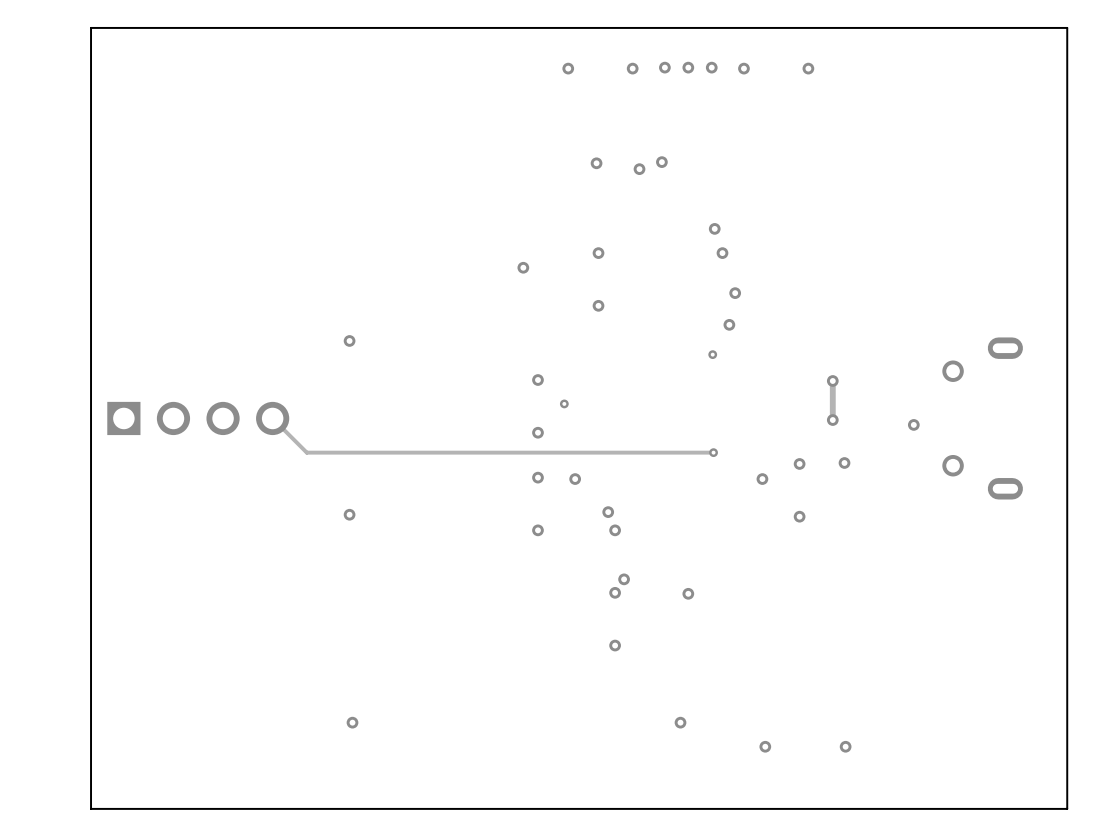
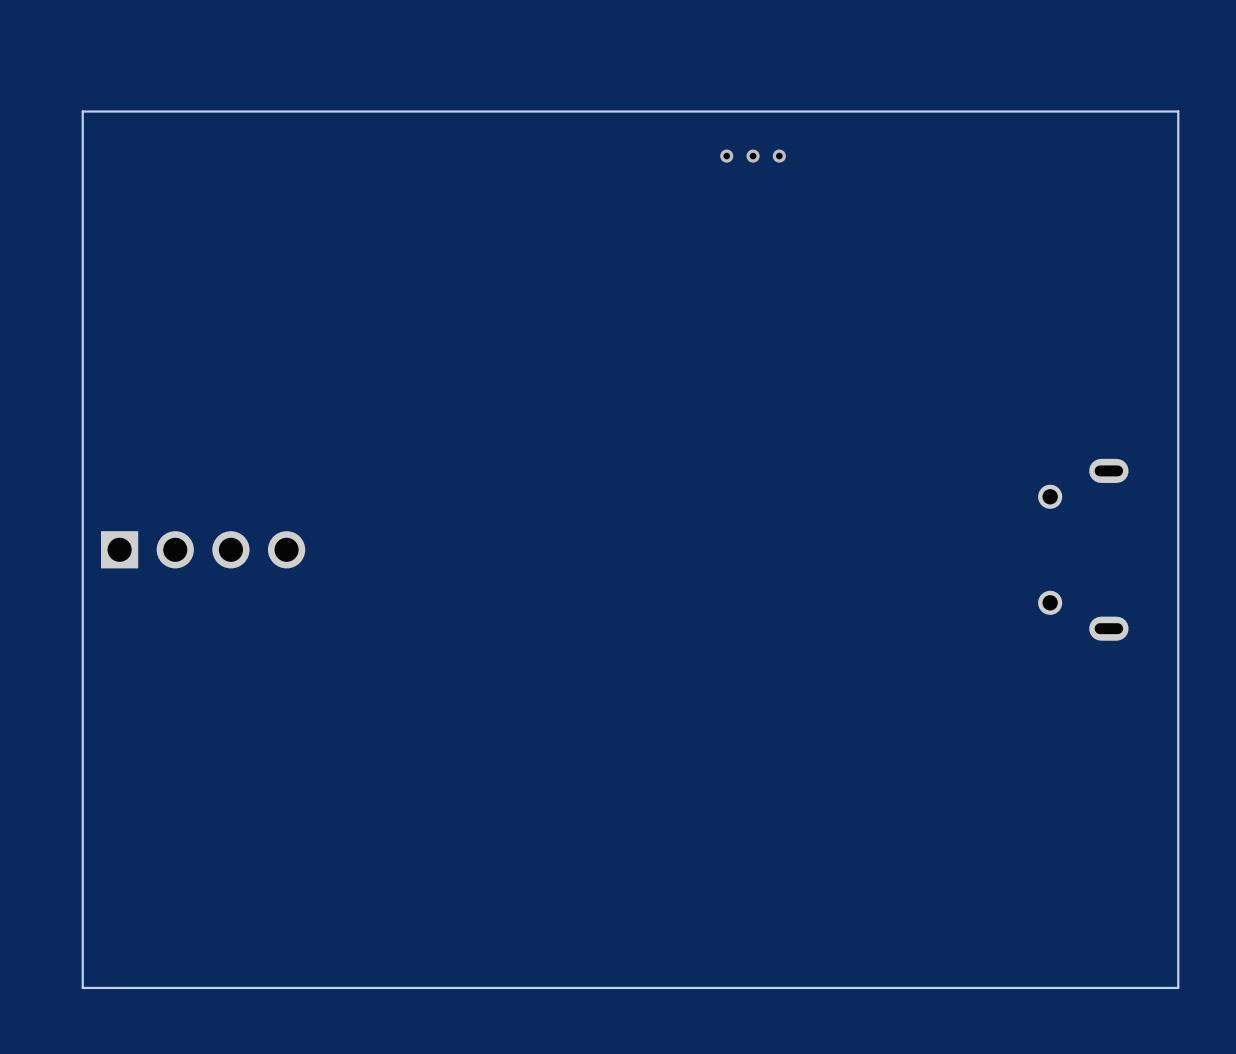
via: (568, 68) -> none
via: (632, 68) -> none
via: (743, 68) -> none
via: (808, 68) -> none
via: (661, 162) -> none
via: (596, 163) -> none
via: (639, 169) -> none
via: (714, 228) -> none
via: (598, 253) -> none
via: (722, 253) -> none
via: (523, 267) -> none
via: (735, 293) -> none
via: (598, 305) -> none
via: (729, 324) -> none
via: (349, 340) -> none
via: (712, 354) -> none
via: (537, 380) -> none
track: (832, 380) (832, 420) -> none
via: (832, 380) -> none
via: (564, 403) -> none
track: (272, 418) (306, 452) (713, 452) -> none
via: (832, 420) -> none
via: (913, 424) -> none
via: (537, 432) -> none
via: (713, 452) -> none
via: (844, 462) -> none
via: (799, 463) -> none
via: (537, 477) -> none
via: (575, 479) -> none
via: (762, 479) -> none
via: (608, 512) -> none
via: (349, 514) -> none
via: (799, 516) -> none
via: (537, 530) -> none
via: (615, 530) -> none
via: (624, 579) -> none
via: (615, 592) -> none
via: (688, 593) -> none
via: (615, 645) -> none
via: (352, 722) -> none
via: (680, 722) -> none
via: (765, 746) -> none
via: (845, 746) -> none

